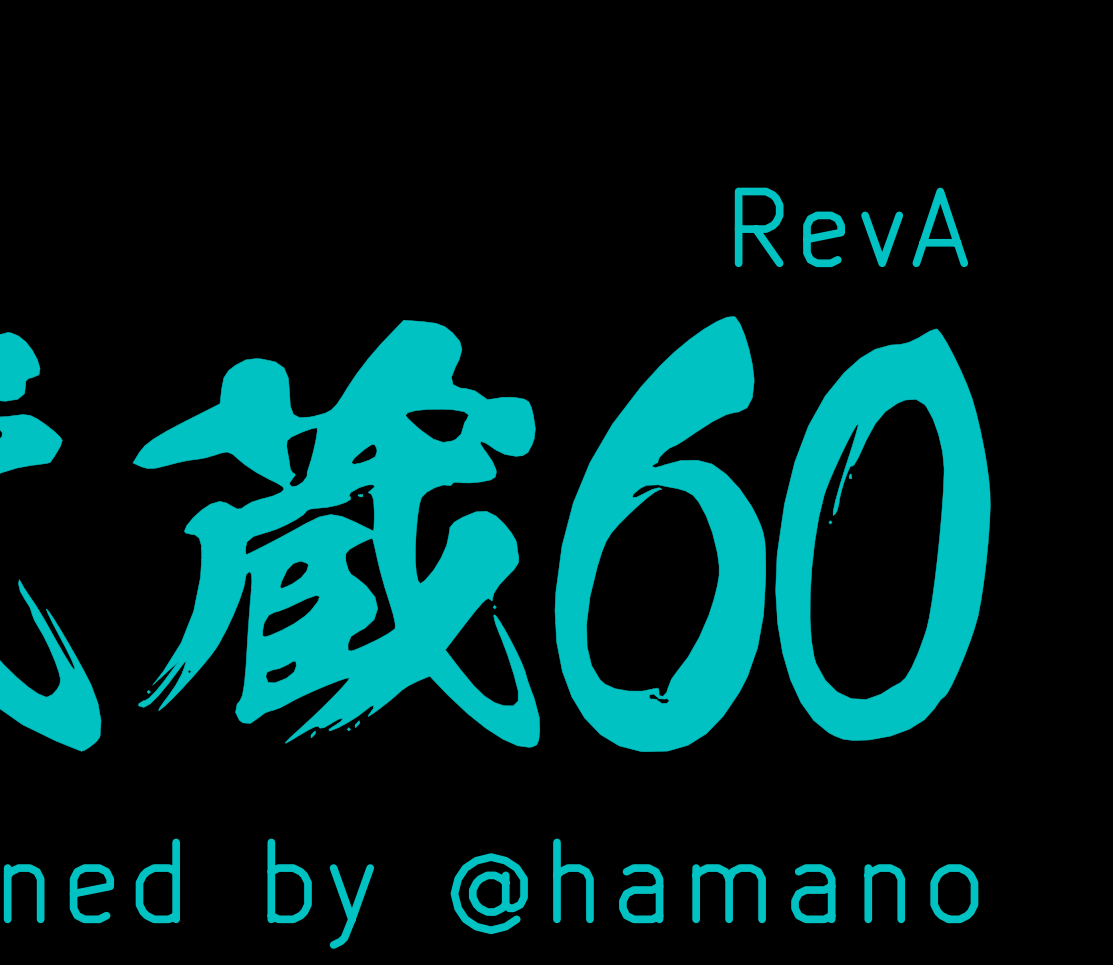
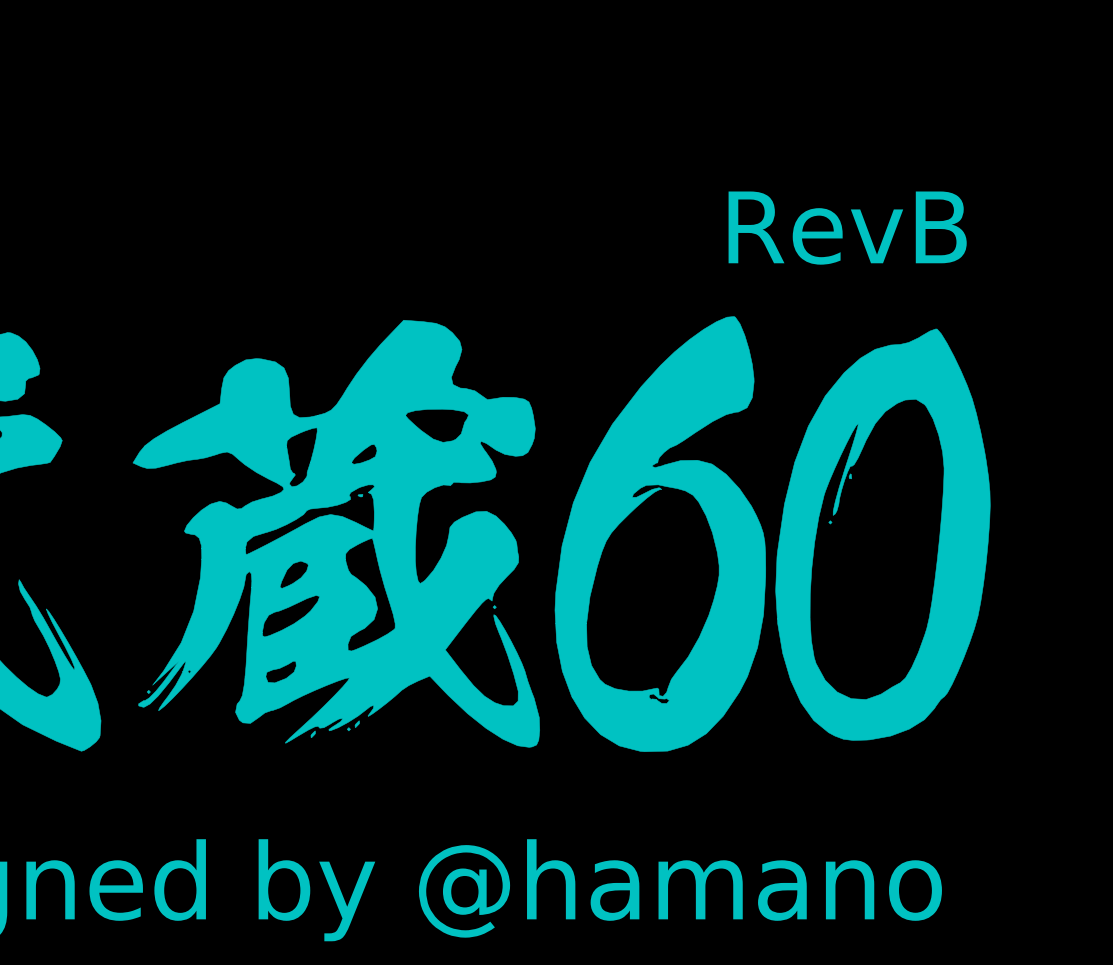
text: RevA (851, 227) -> RevB (847, 228)

